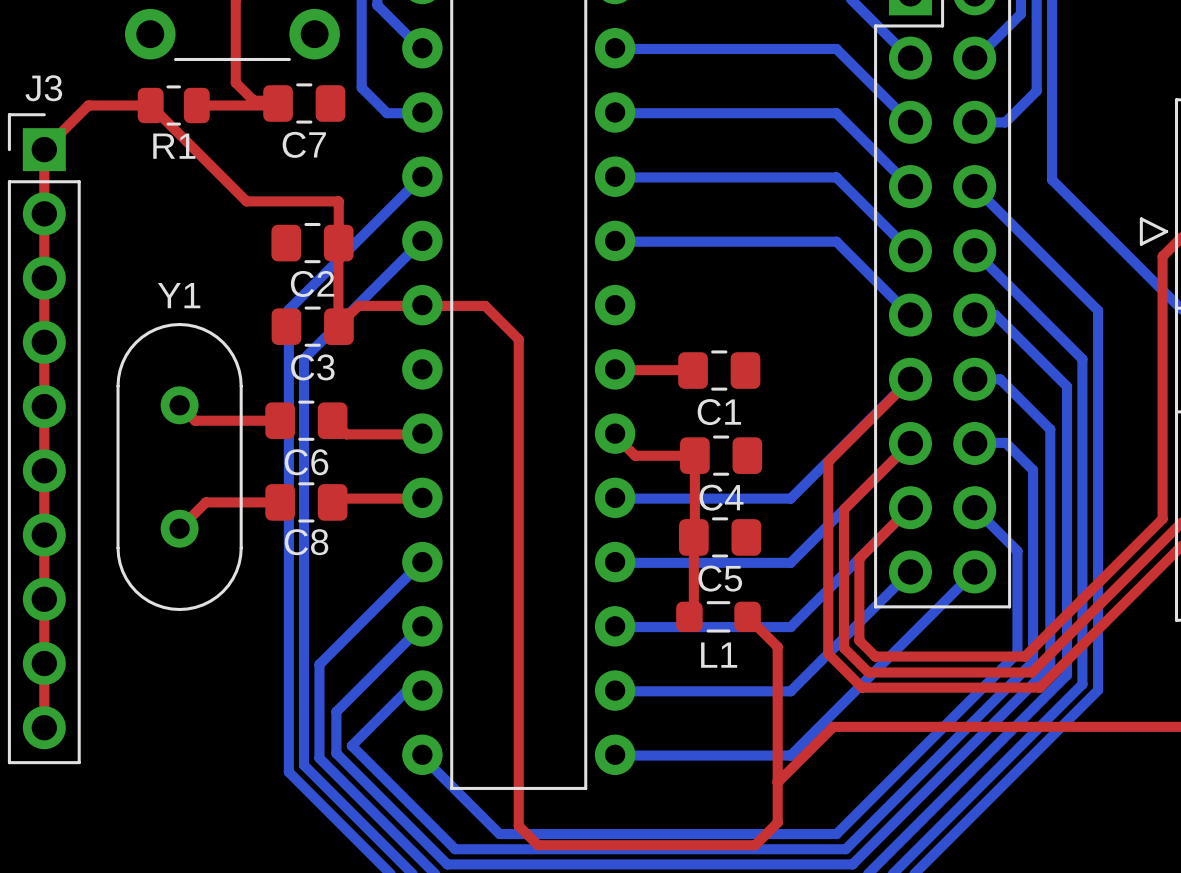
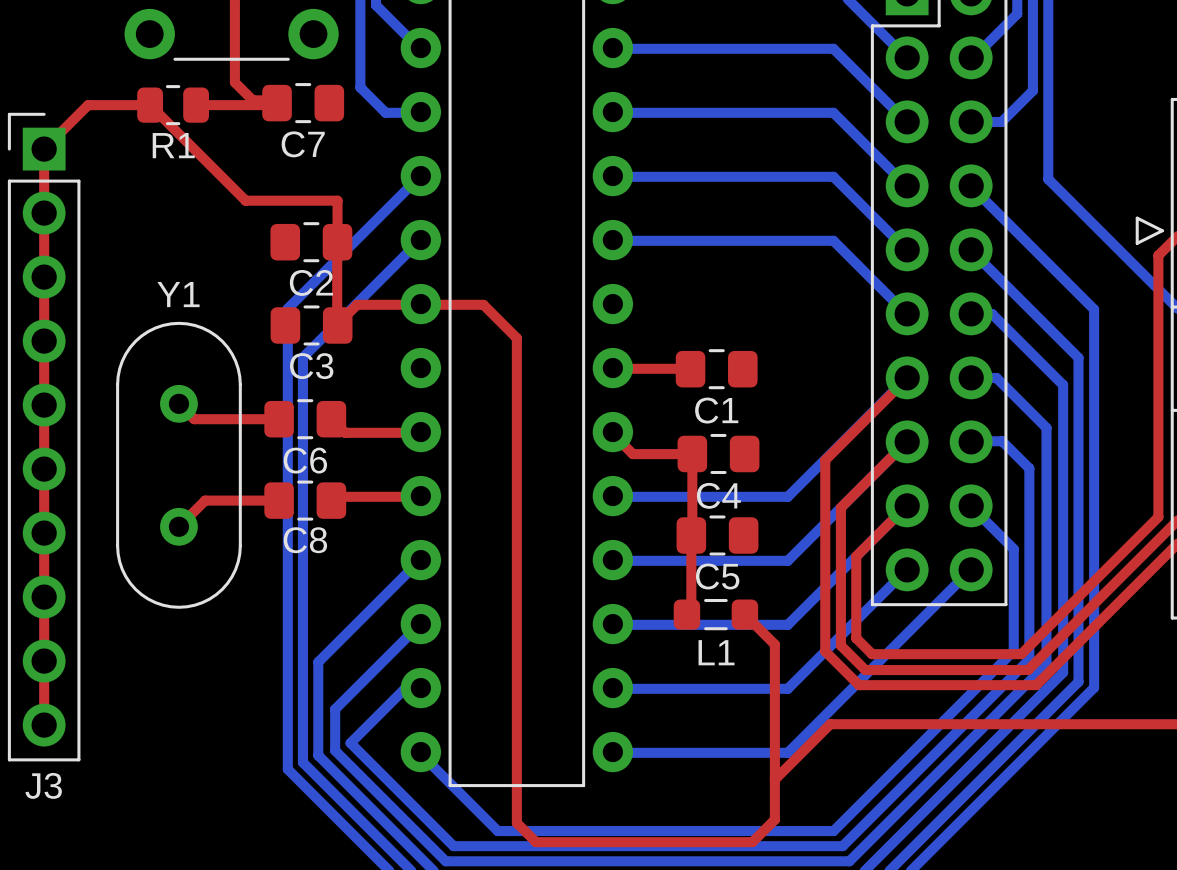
J3 name position: J3 (43, 88) -> J3 (43, 785)

